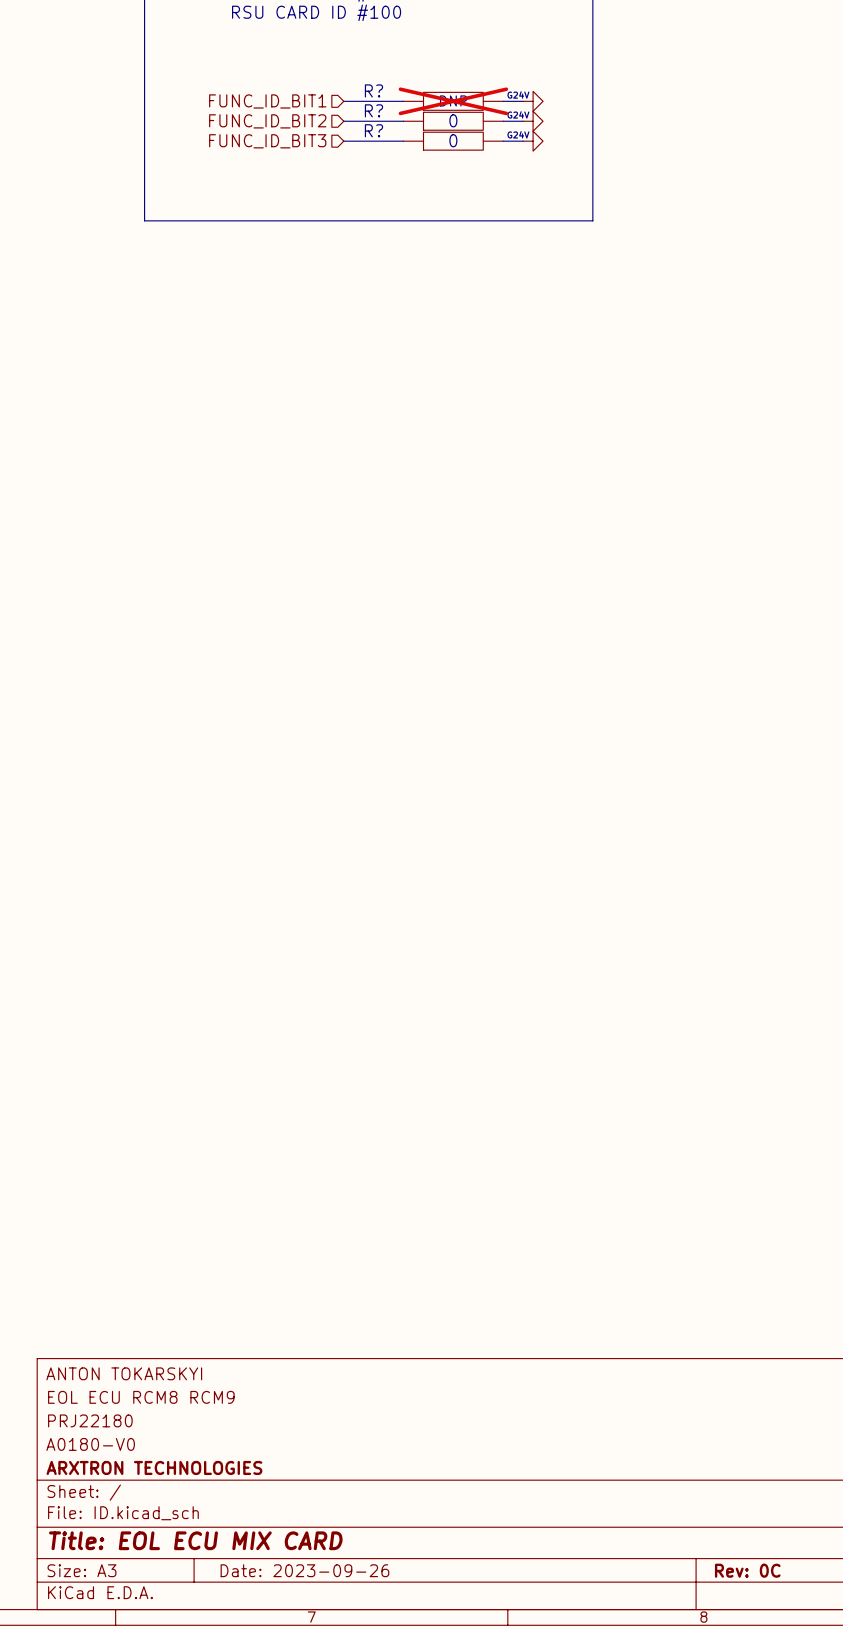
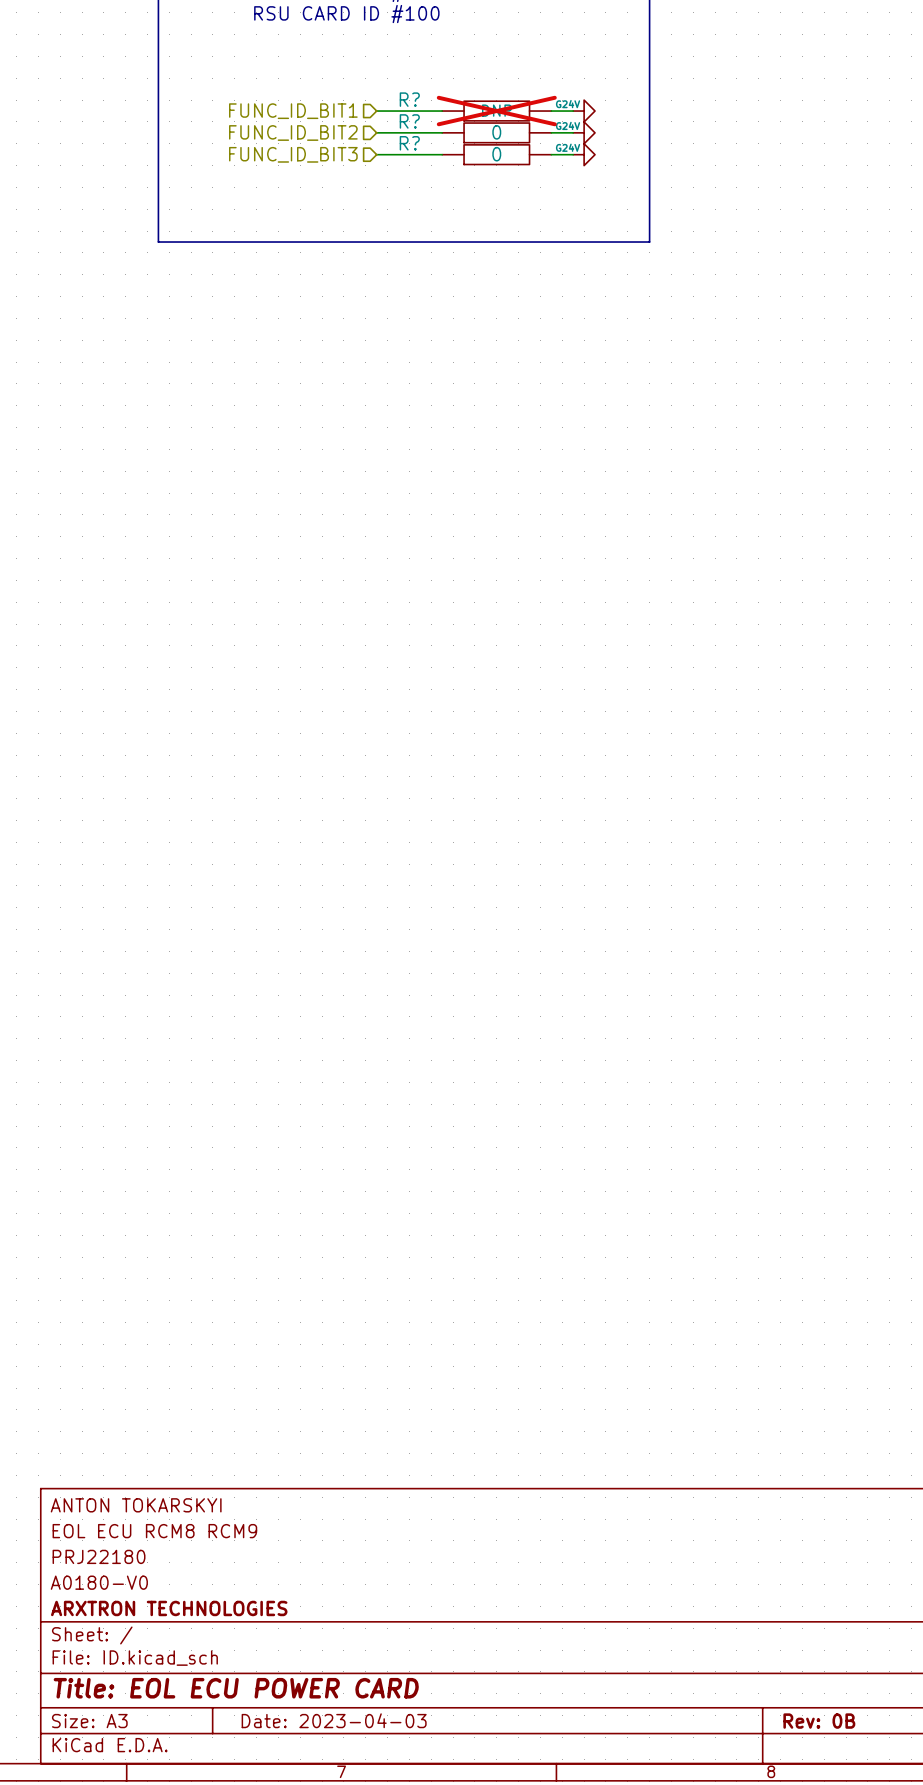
title block: Title: EOL ECU MIX CARD (195, 1540) -> Title: EOL ECU POWER CARD (236, 1688)
title block: Date: 2023-09-26 (304, 1570) -> Date: 2023-04-03 (334, 1720)
title block: Rev: 0C (747, 1570) -> Rev: 0B (819, 1721)

